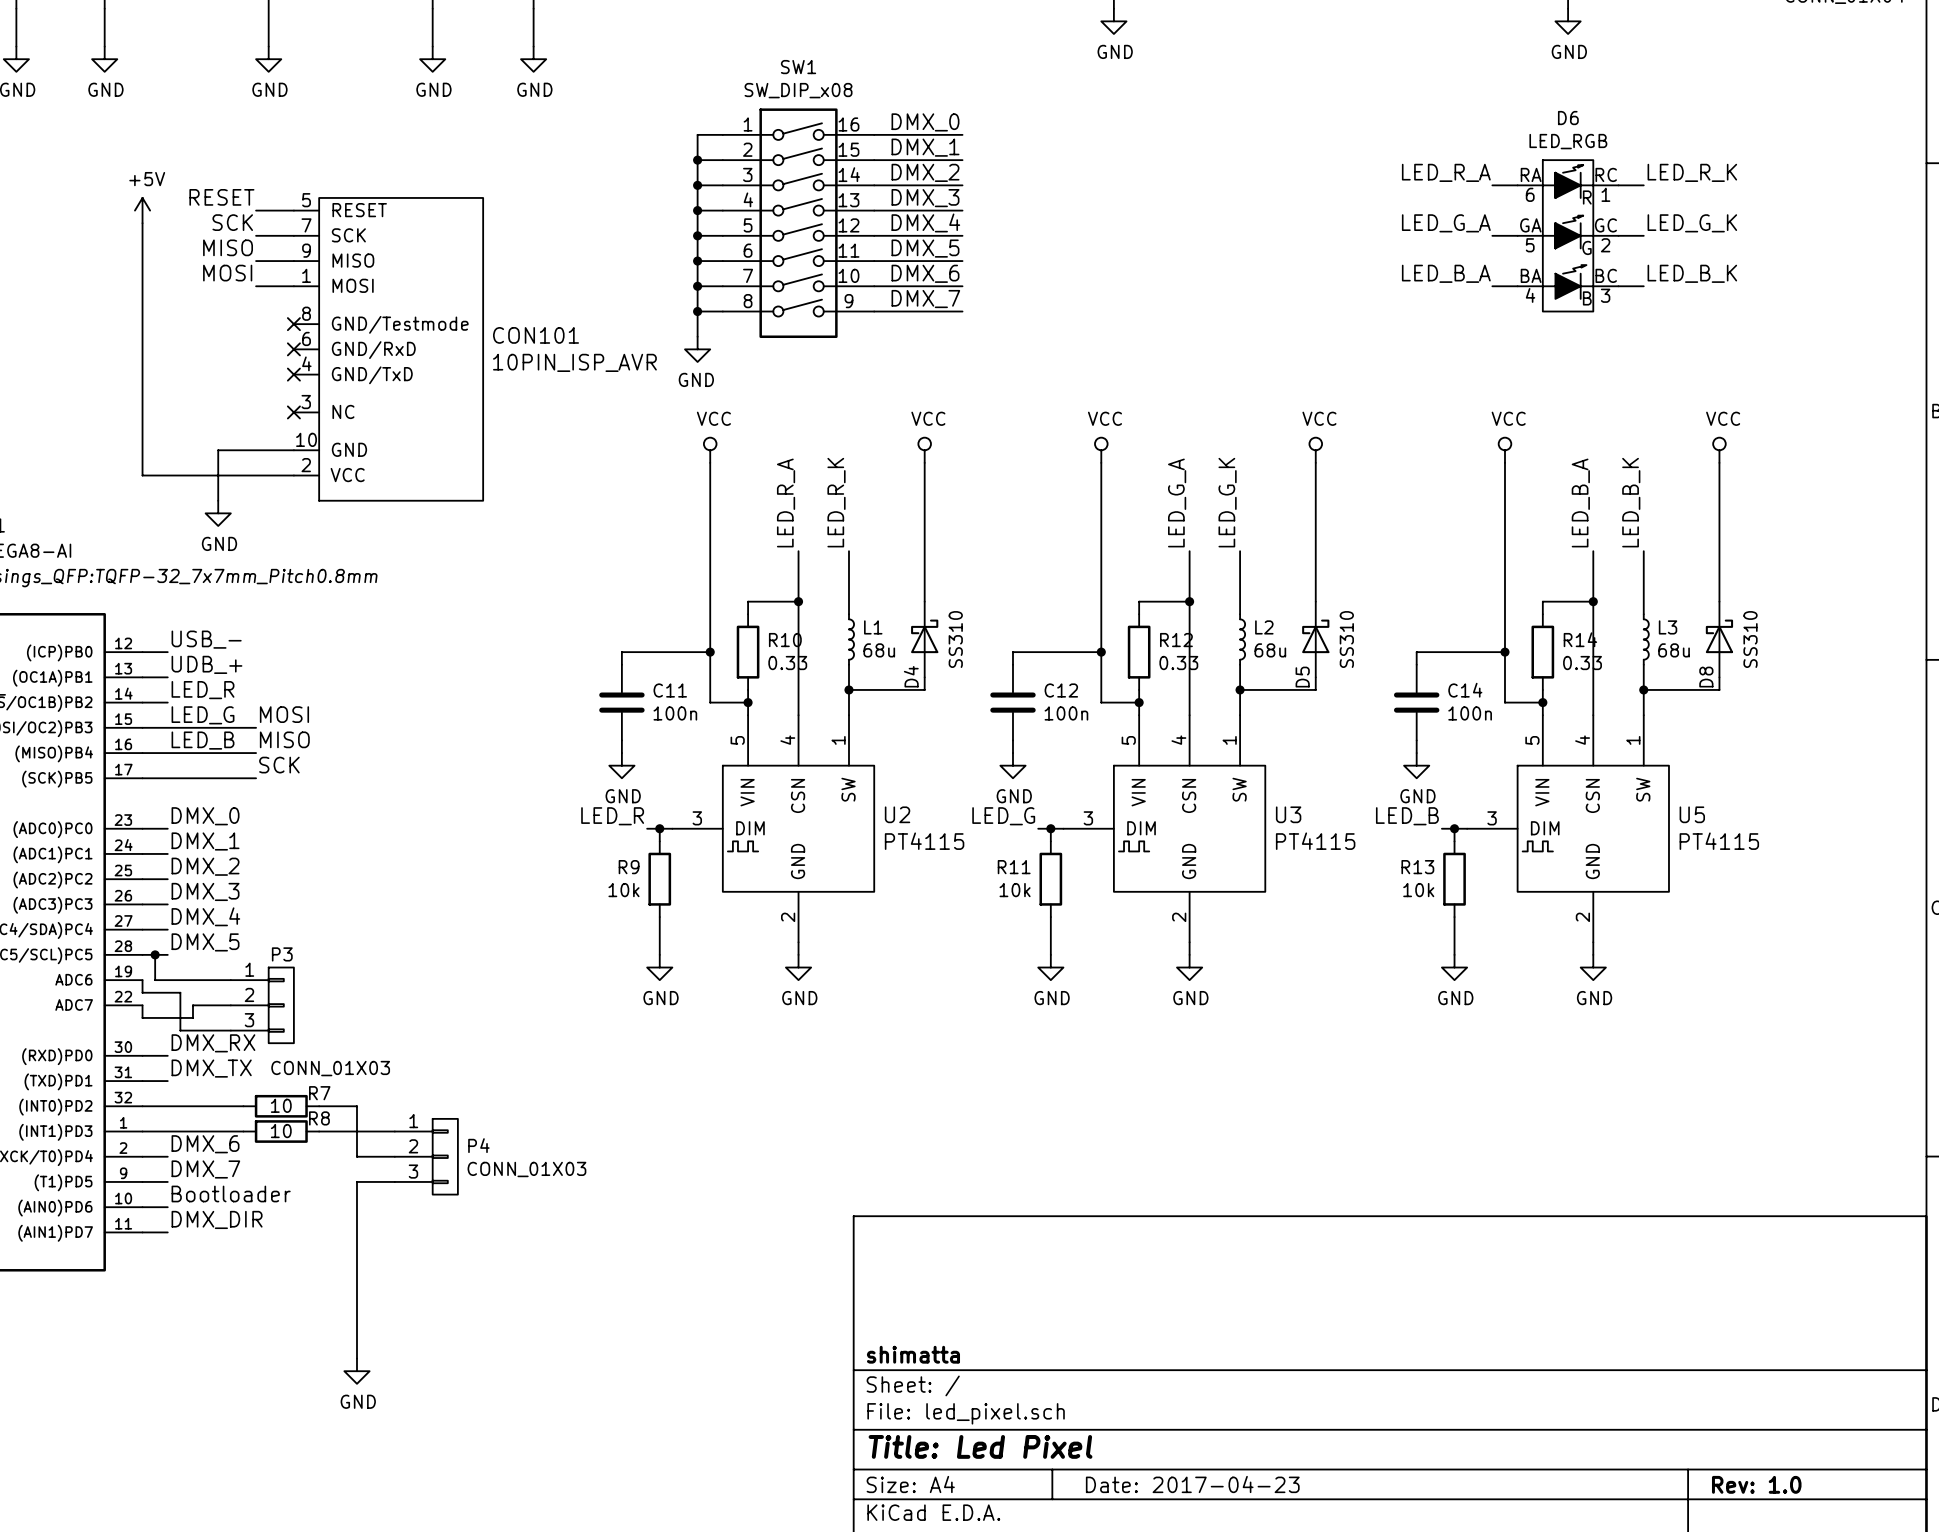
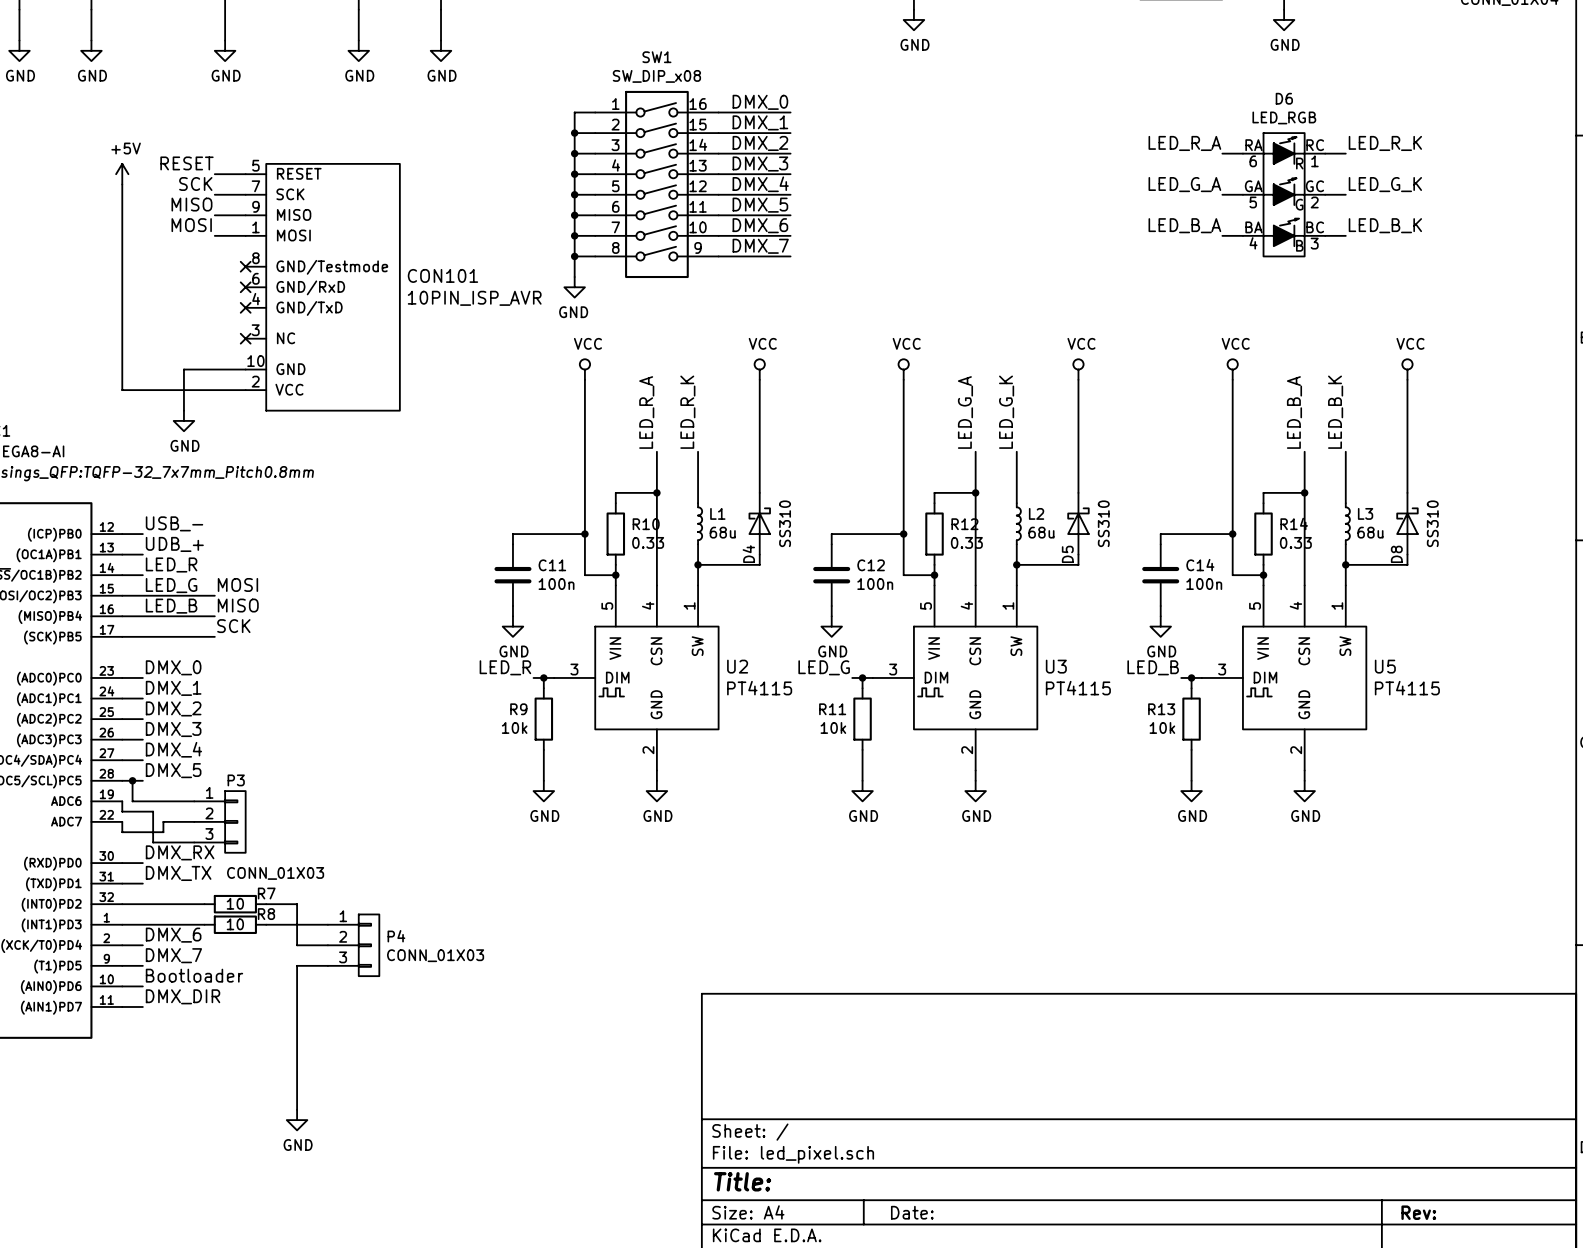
title block: shimatta (913, 1354) -> none
title block: Title: Led Pixel (980, 1446) -> Title: (742, 1181)
title block: Date: 2017-04-23 (1192, 1484) -> Date: (912, 1212)
title block: Rev: 1.0 (1756, 1484) -> Rev: (1418, 1212)

